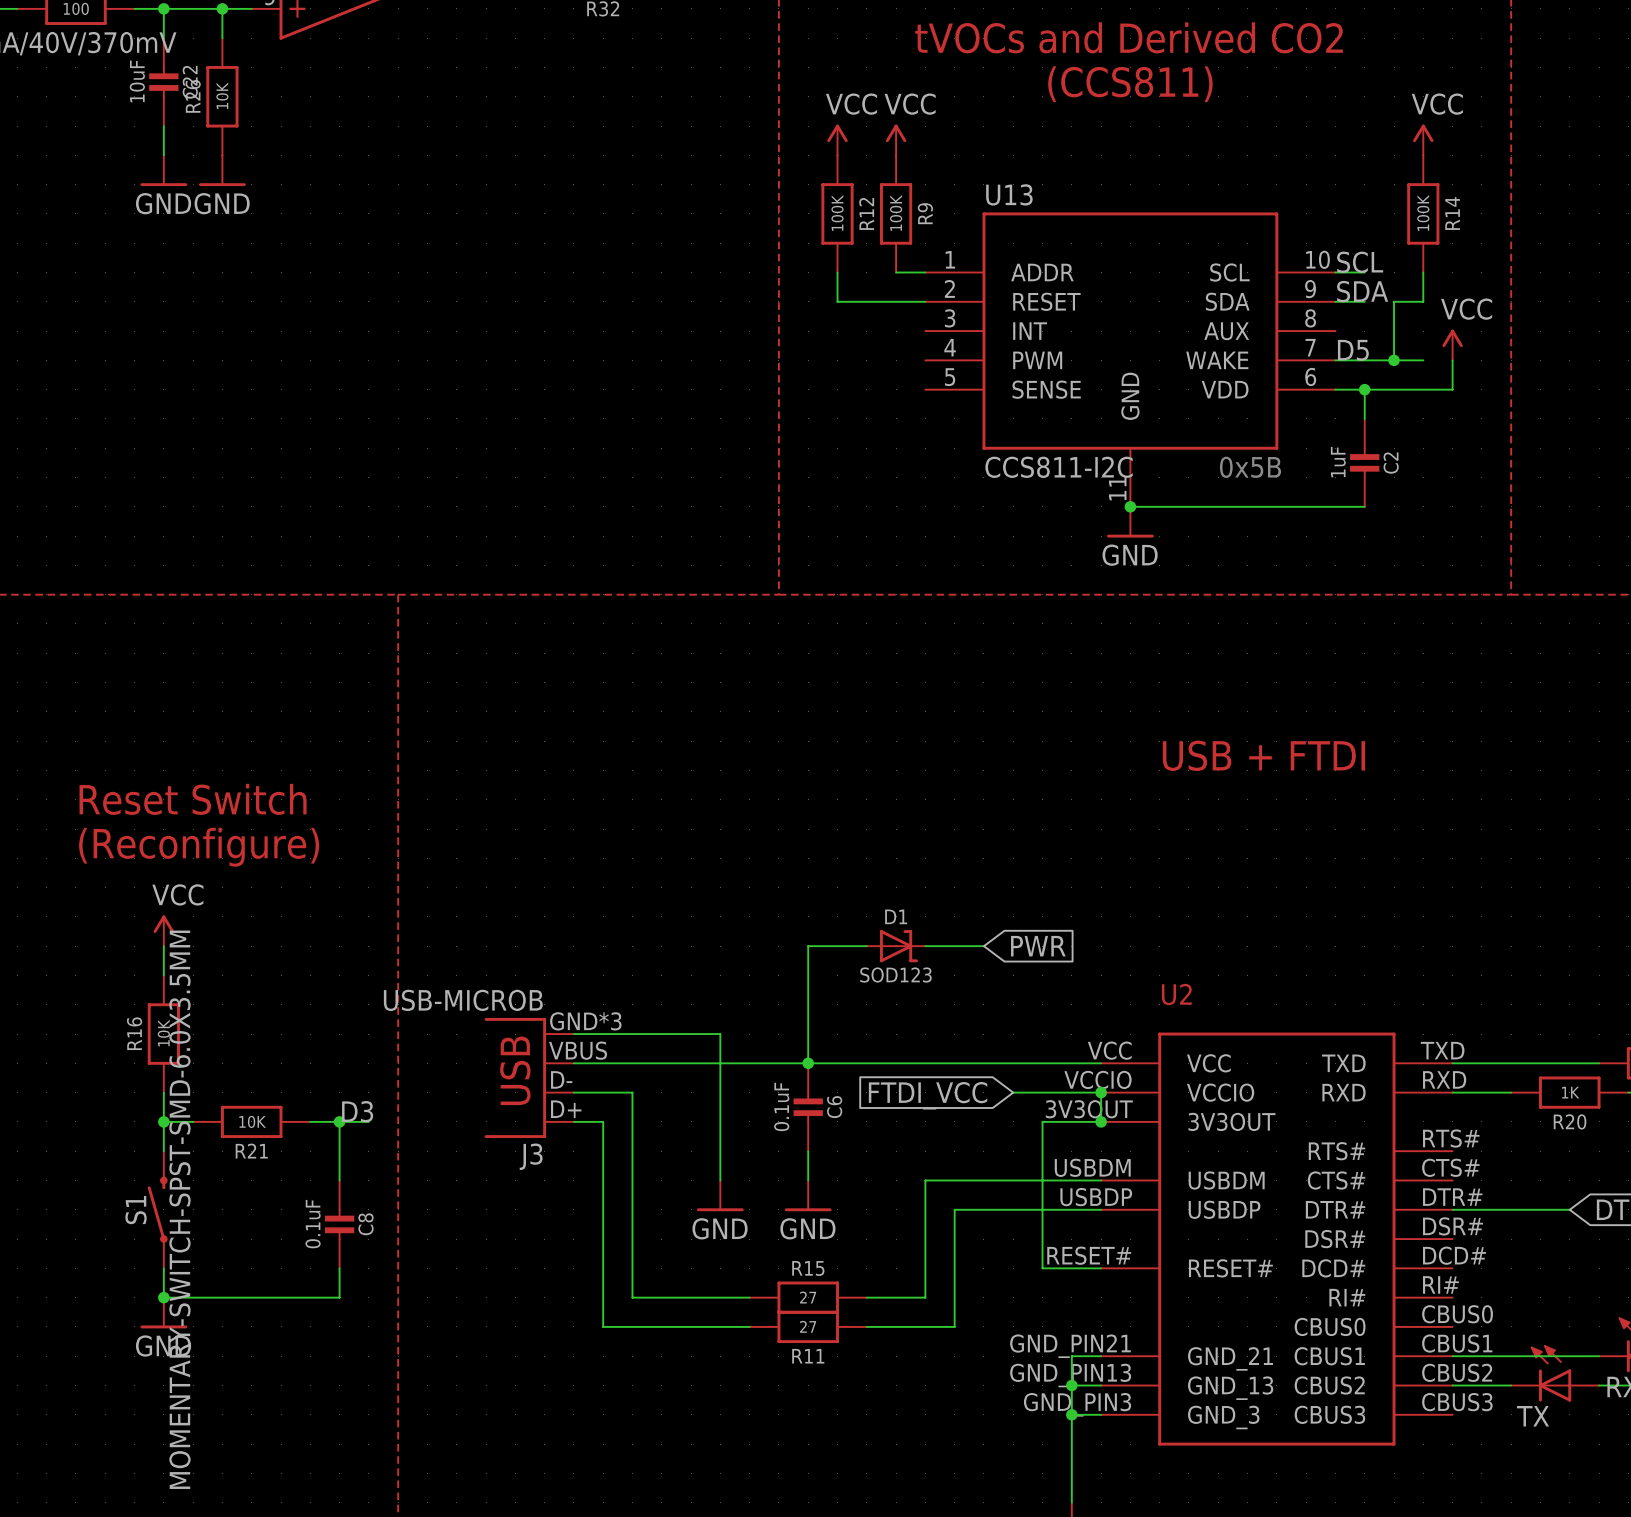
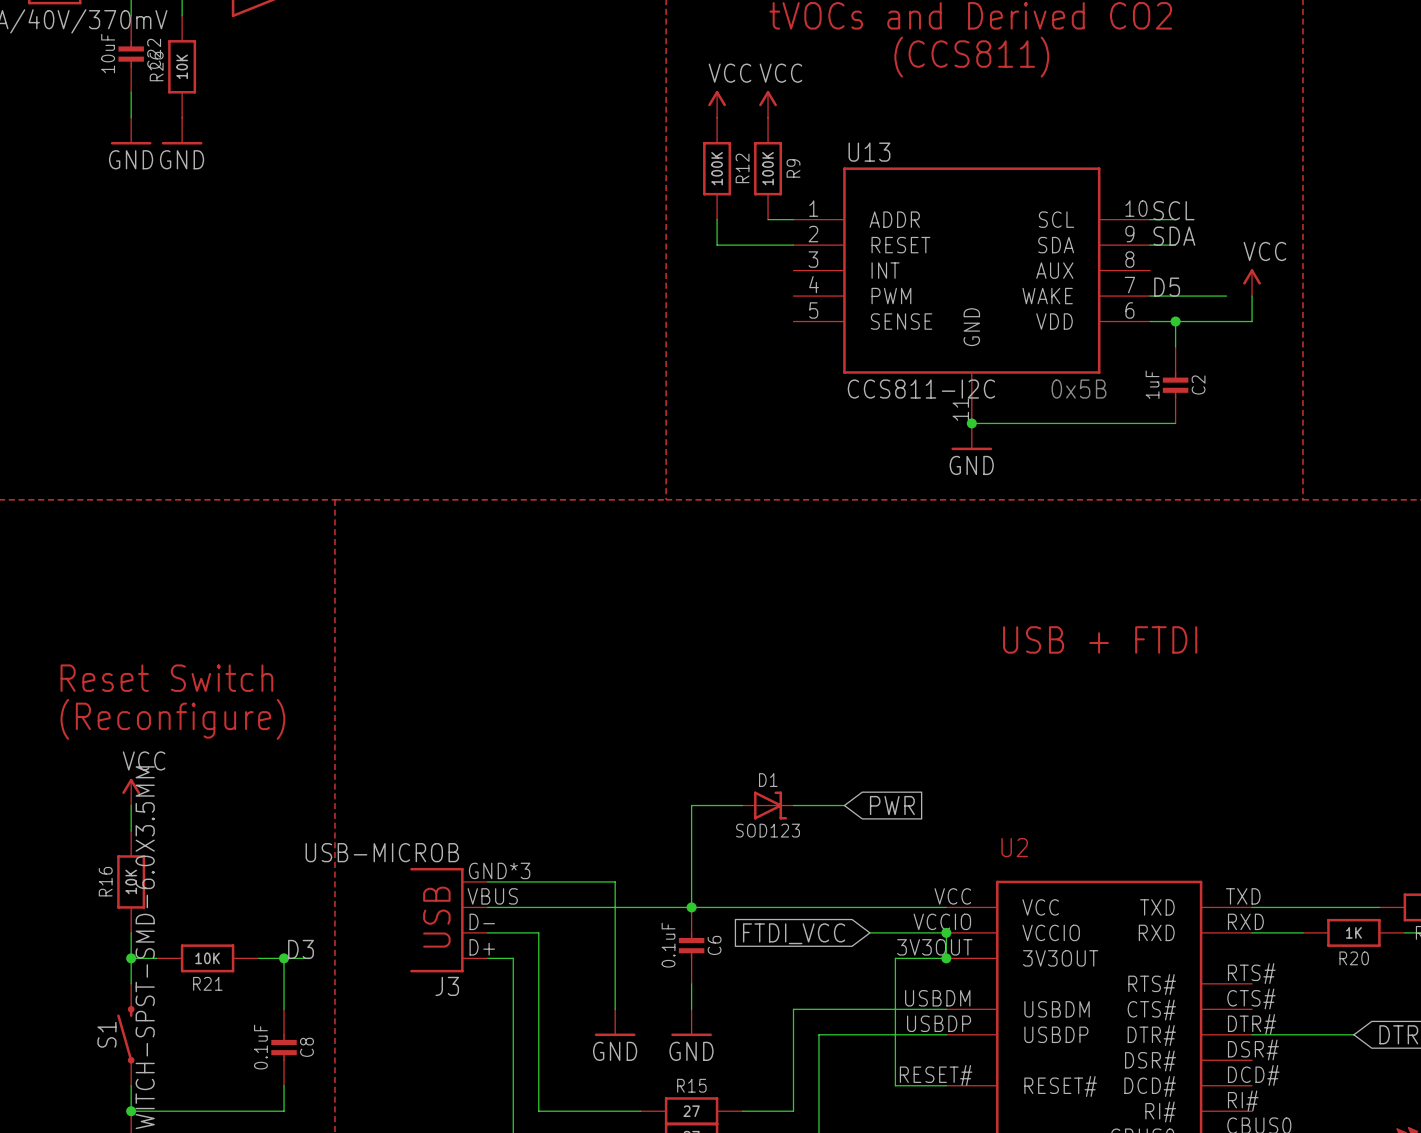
power symbol: VCC (1423, 139) -> none
R14: 100K (1423, 213) -> none
wire: (1423, 272) (1423, 301) (1394, 301) (1394, 360) -> none
junction: (1394, 360) -> none

